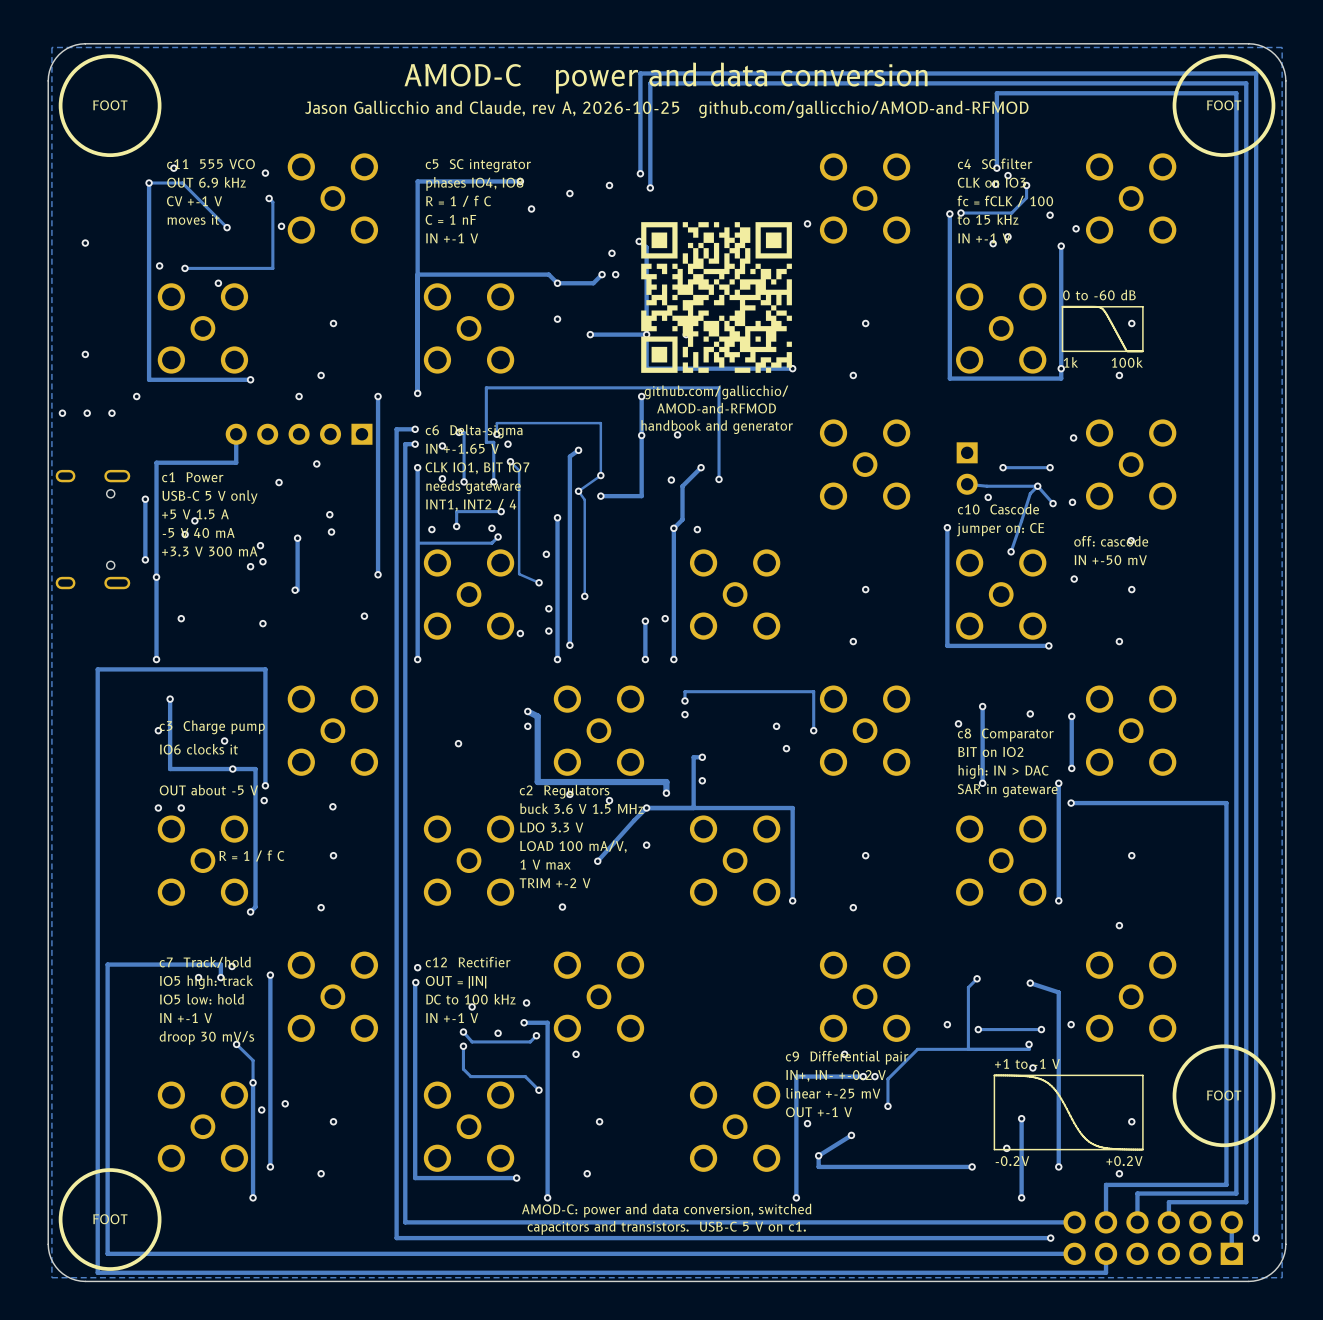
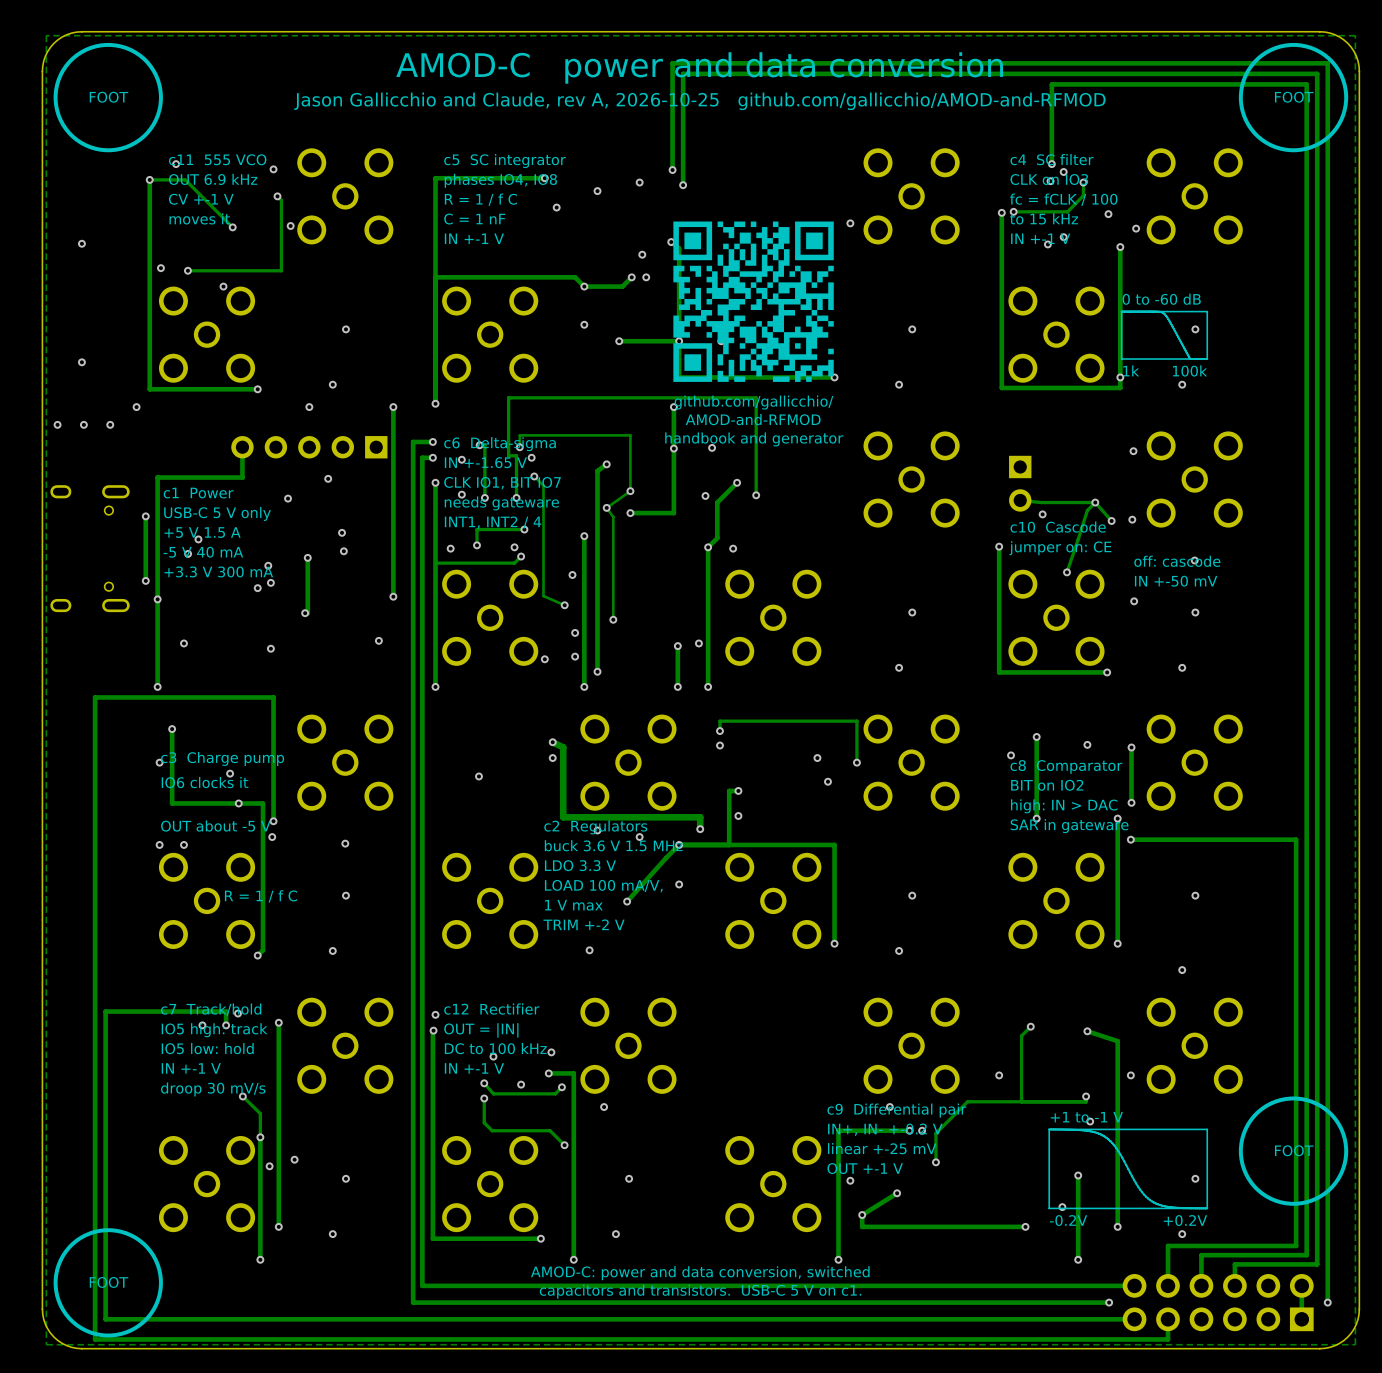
via: (1003, 467) -> none
track: (1050, 467) (1003, 467) -> none
via: (1050, 467) -> none
via: (978, 1029) -> none
track: (1041, 1029) (978, 1029) -> none
via: (1041, 1029) -> none

